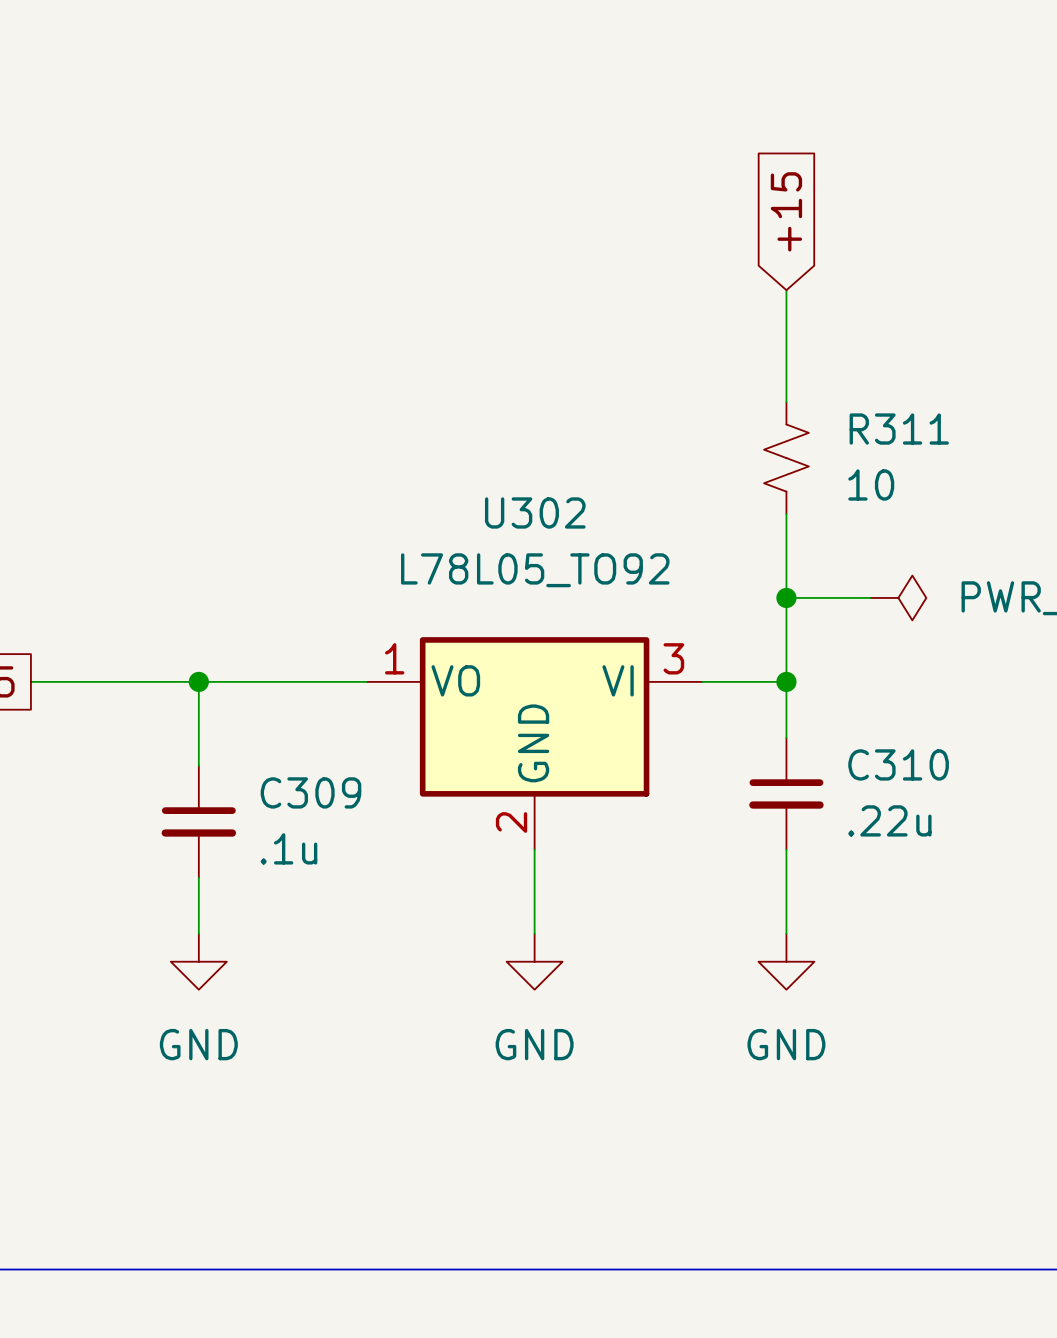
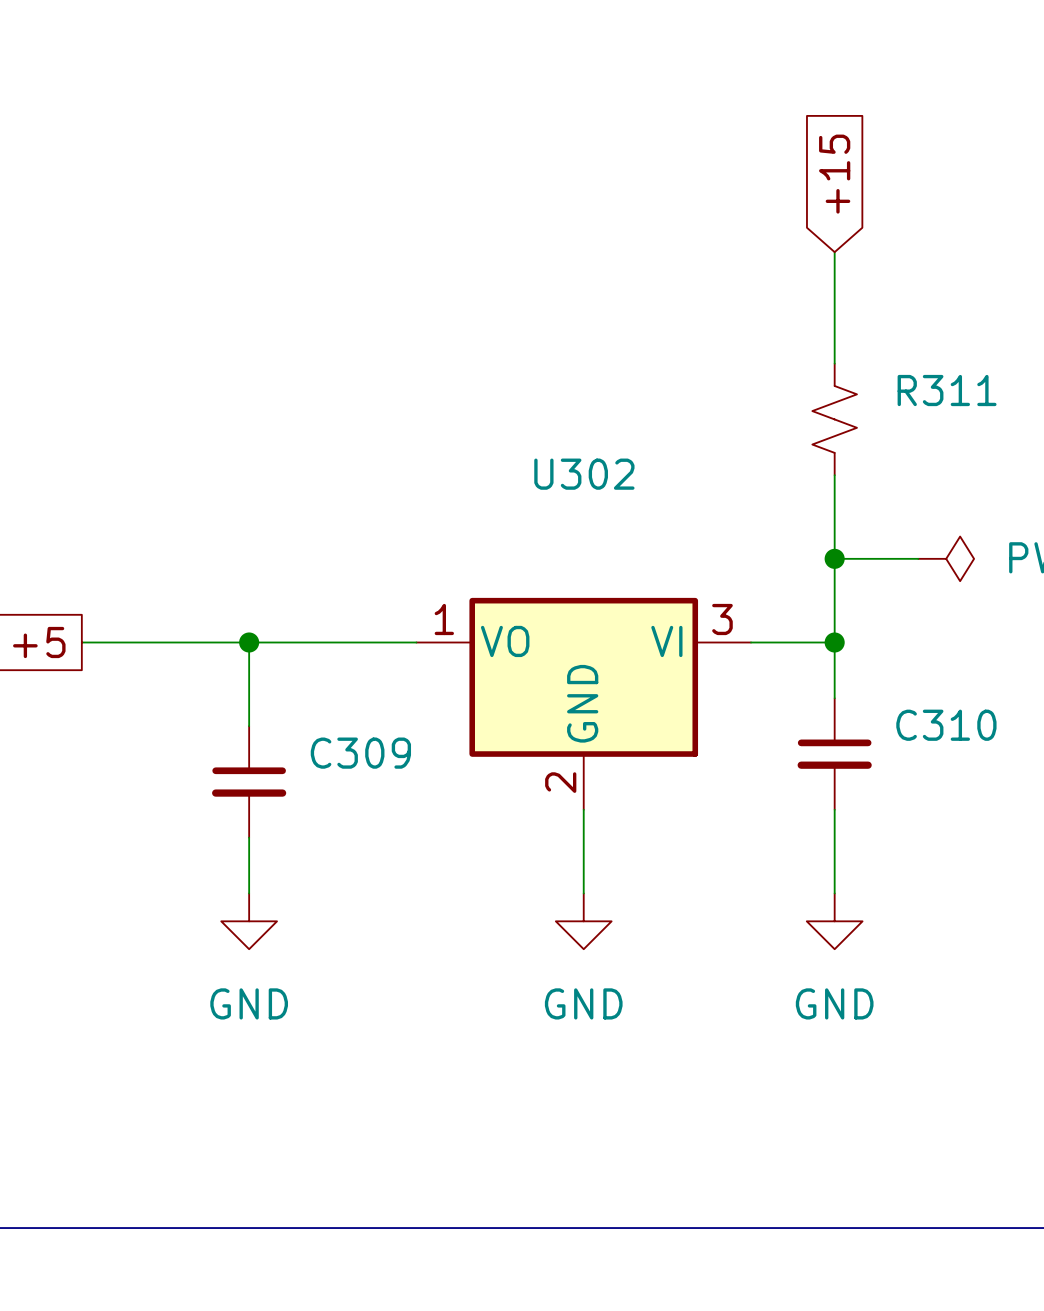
R311 value: 10 (871, 484) -> none
U302 value: L78L05_TO92 (535, 570) -> none
C310 value: .22u (889, 820) -> none
C309 value: .1u (288, 848) -> none

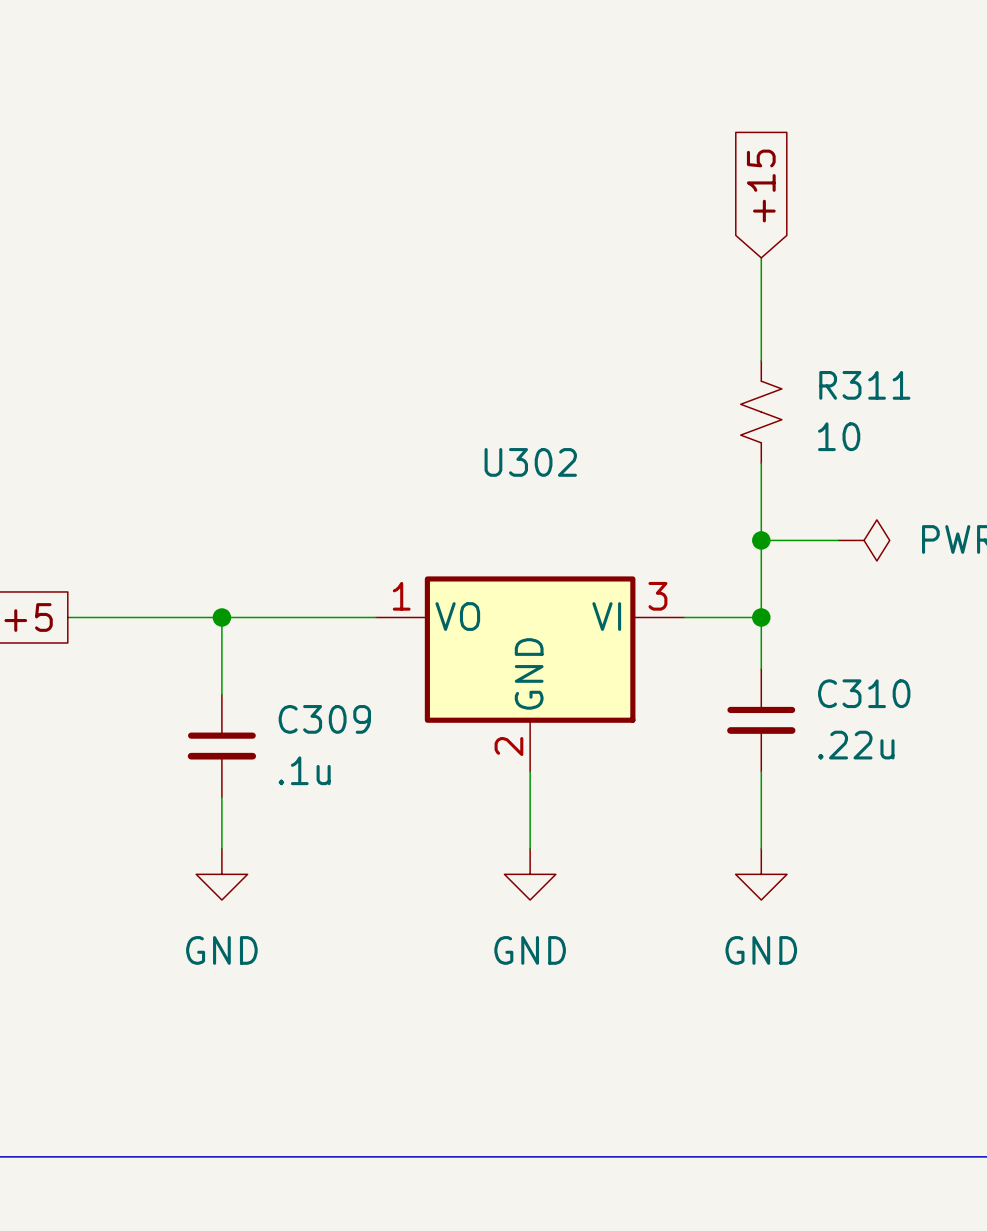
R311 value: none -> 10 (839, 436)
C310 value: none -> .22u (856, 745)
C309 value: none -> .1u (304, 770)

